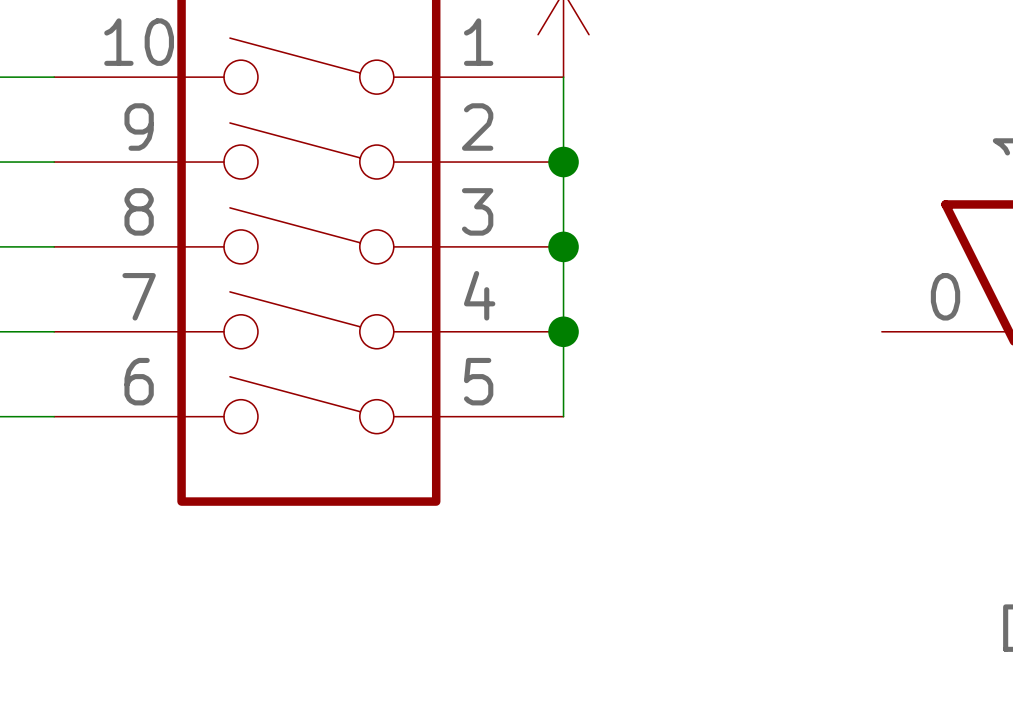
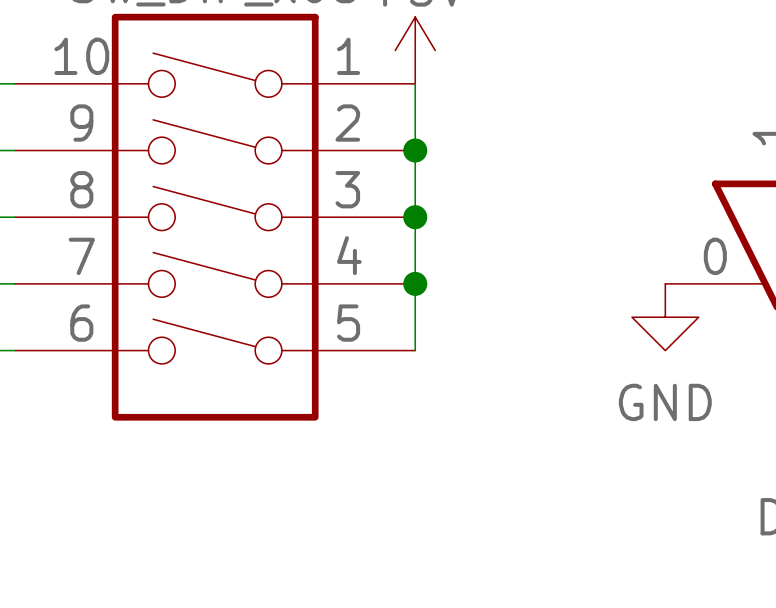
power symbol: none -> GND (665, 317)

